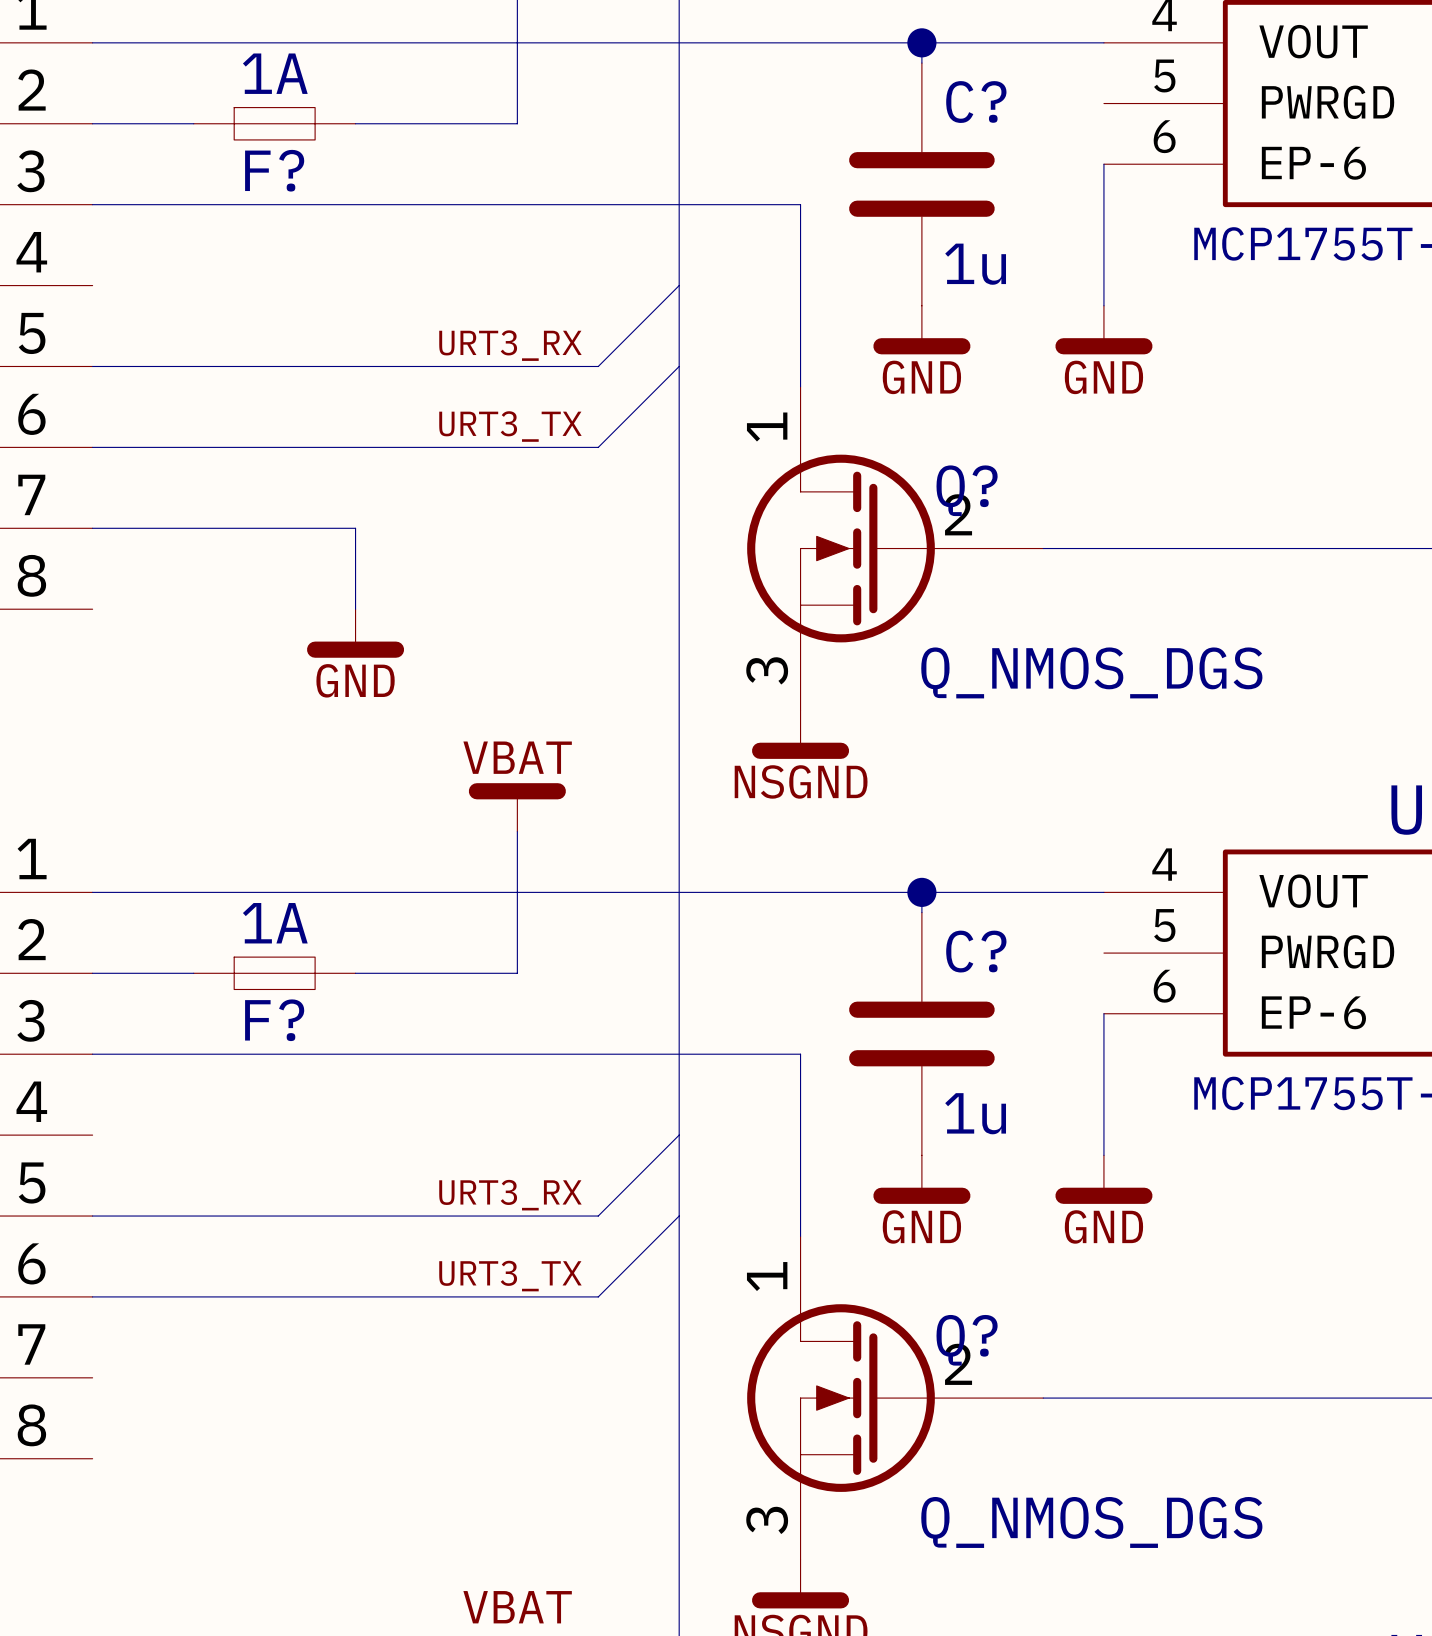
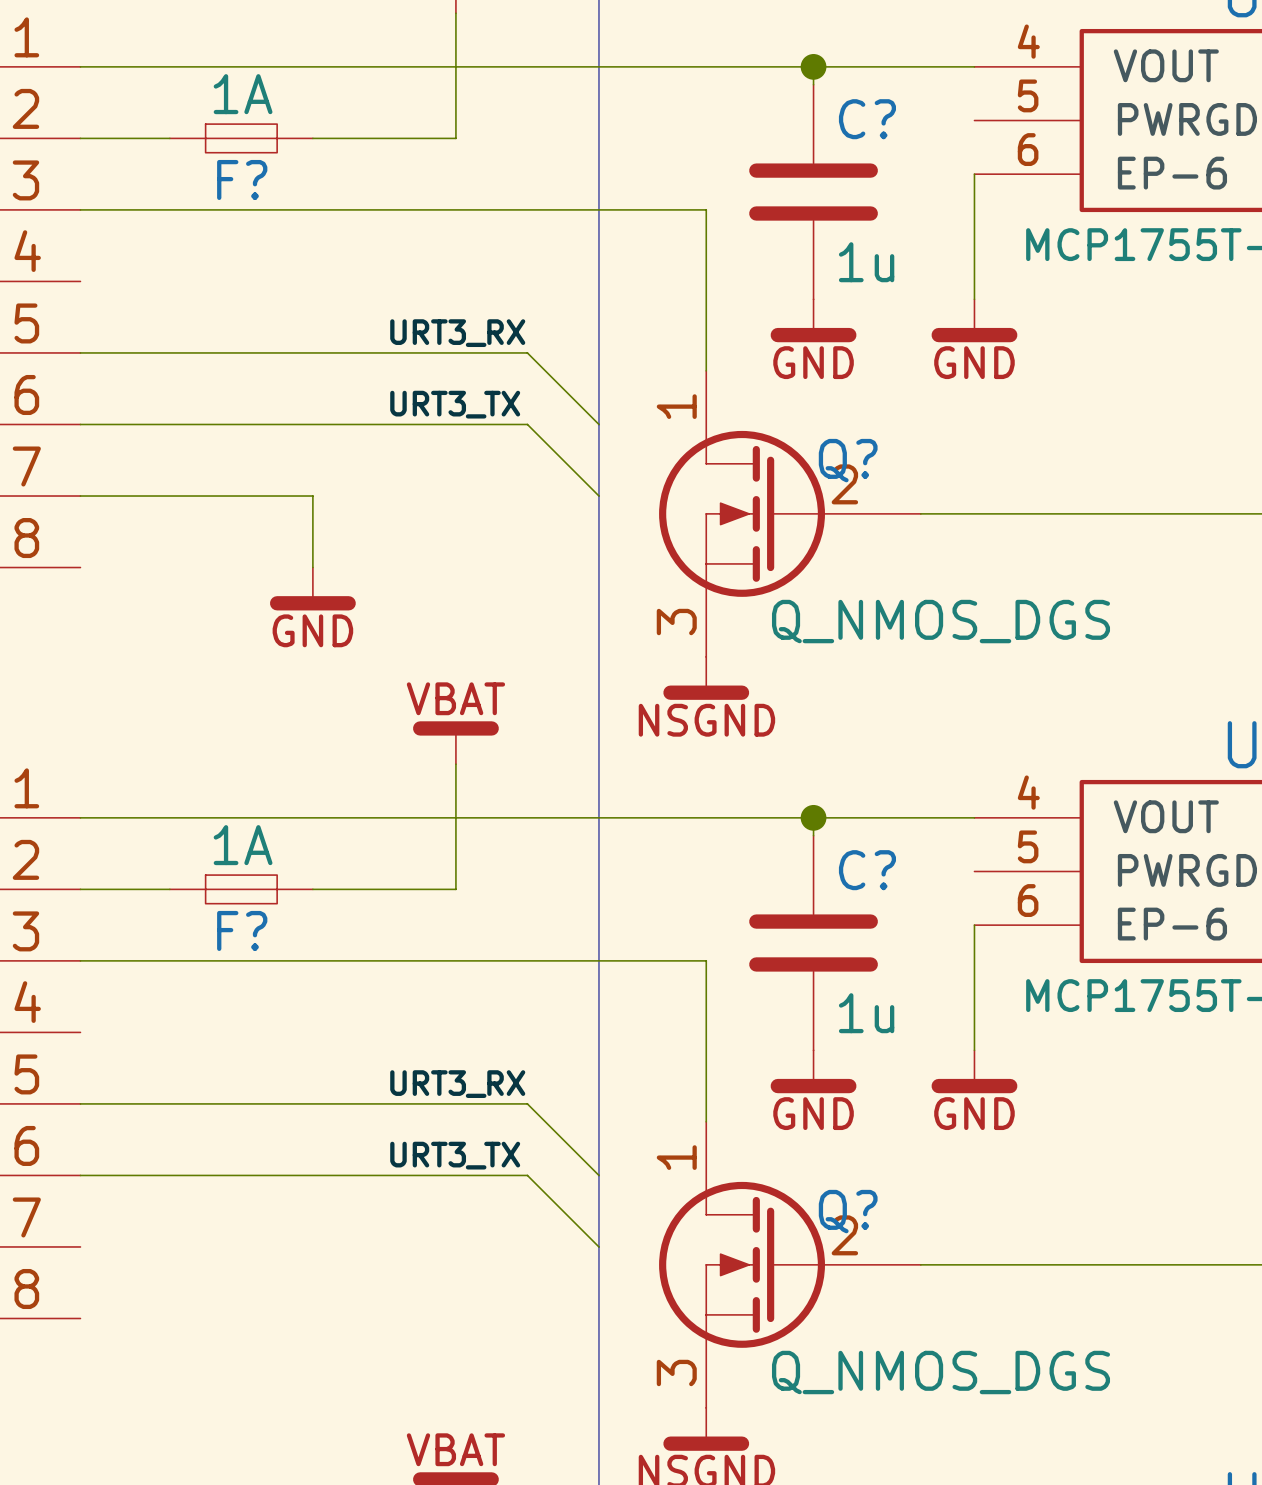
wire: (679, 285) (598, 366) -> (598, 424) (527, 352)
wire: (679, 366) (598, 447) -> (598, 496) (527, 424)
wire: (679, 1135) (598, 1216) -> (598, 1175) (527, 1103)
wire: (679, 1216) (598, 1296) -> (598, 1246) (527, 1175)

